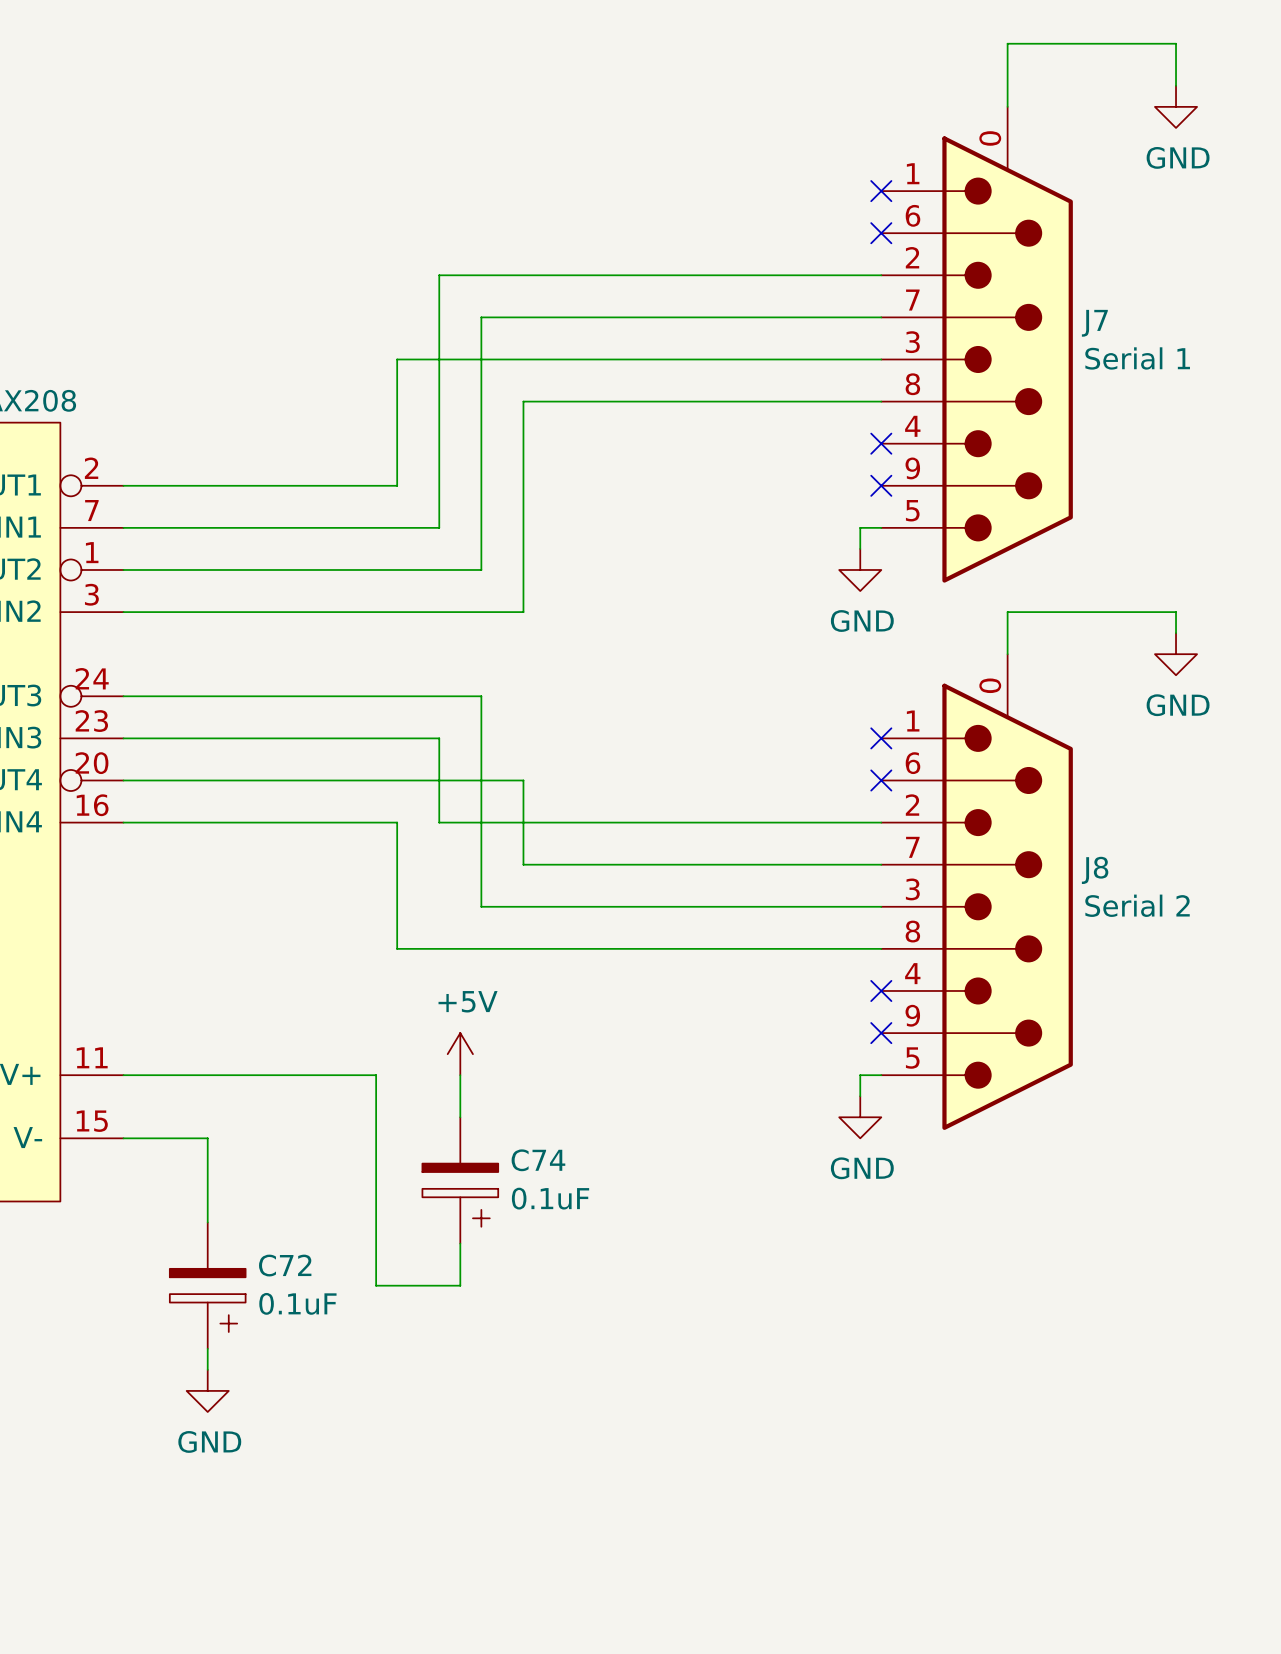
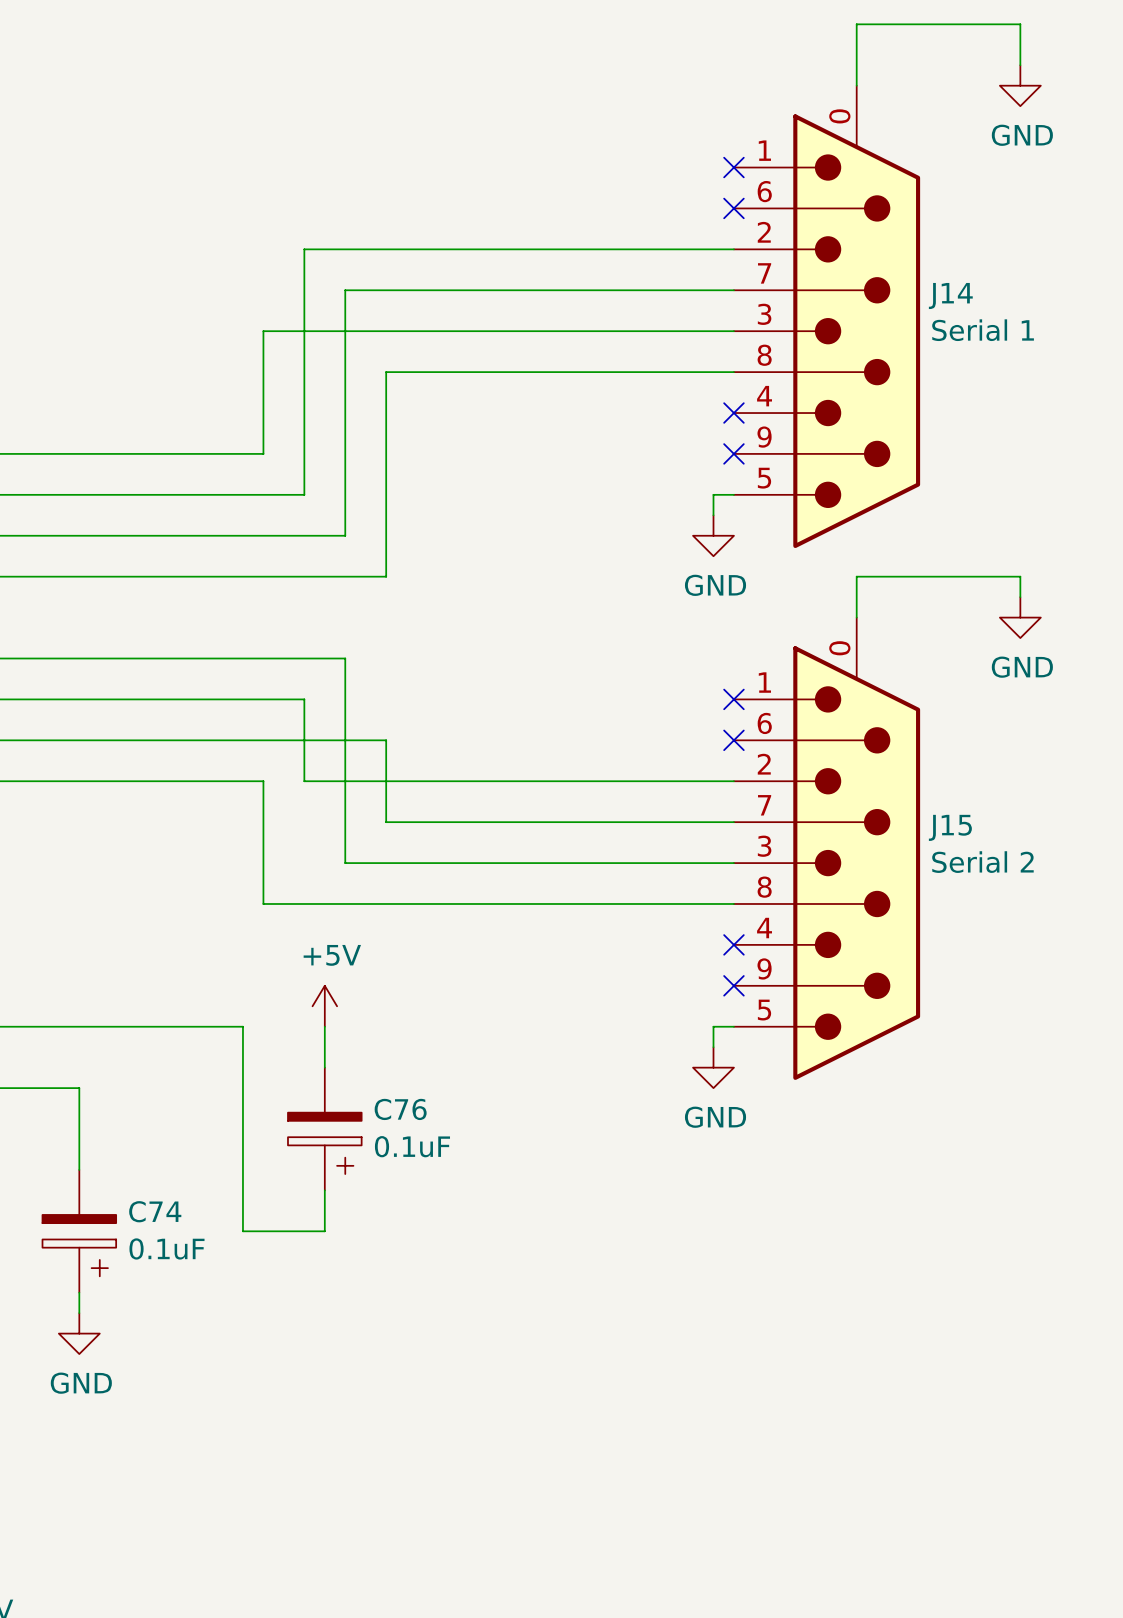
J7 name: J7 (1094, 323) -> J14 (950, 296)
J8 name: J8 (1095, 870) -> J15 (950, 827)
C74 name: C74 (538, 1160) -> C76 (400, 1109)
C72 name: C72 (285, 1265) -> C74 (155, 1211)

